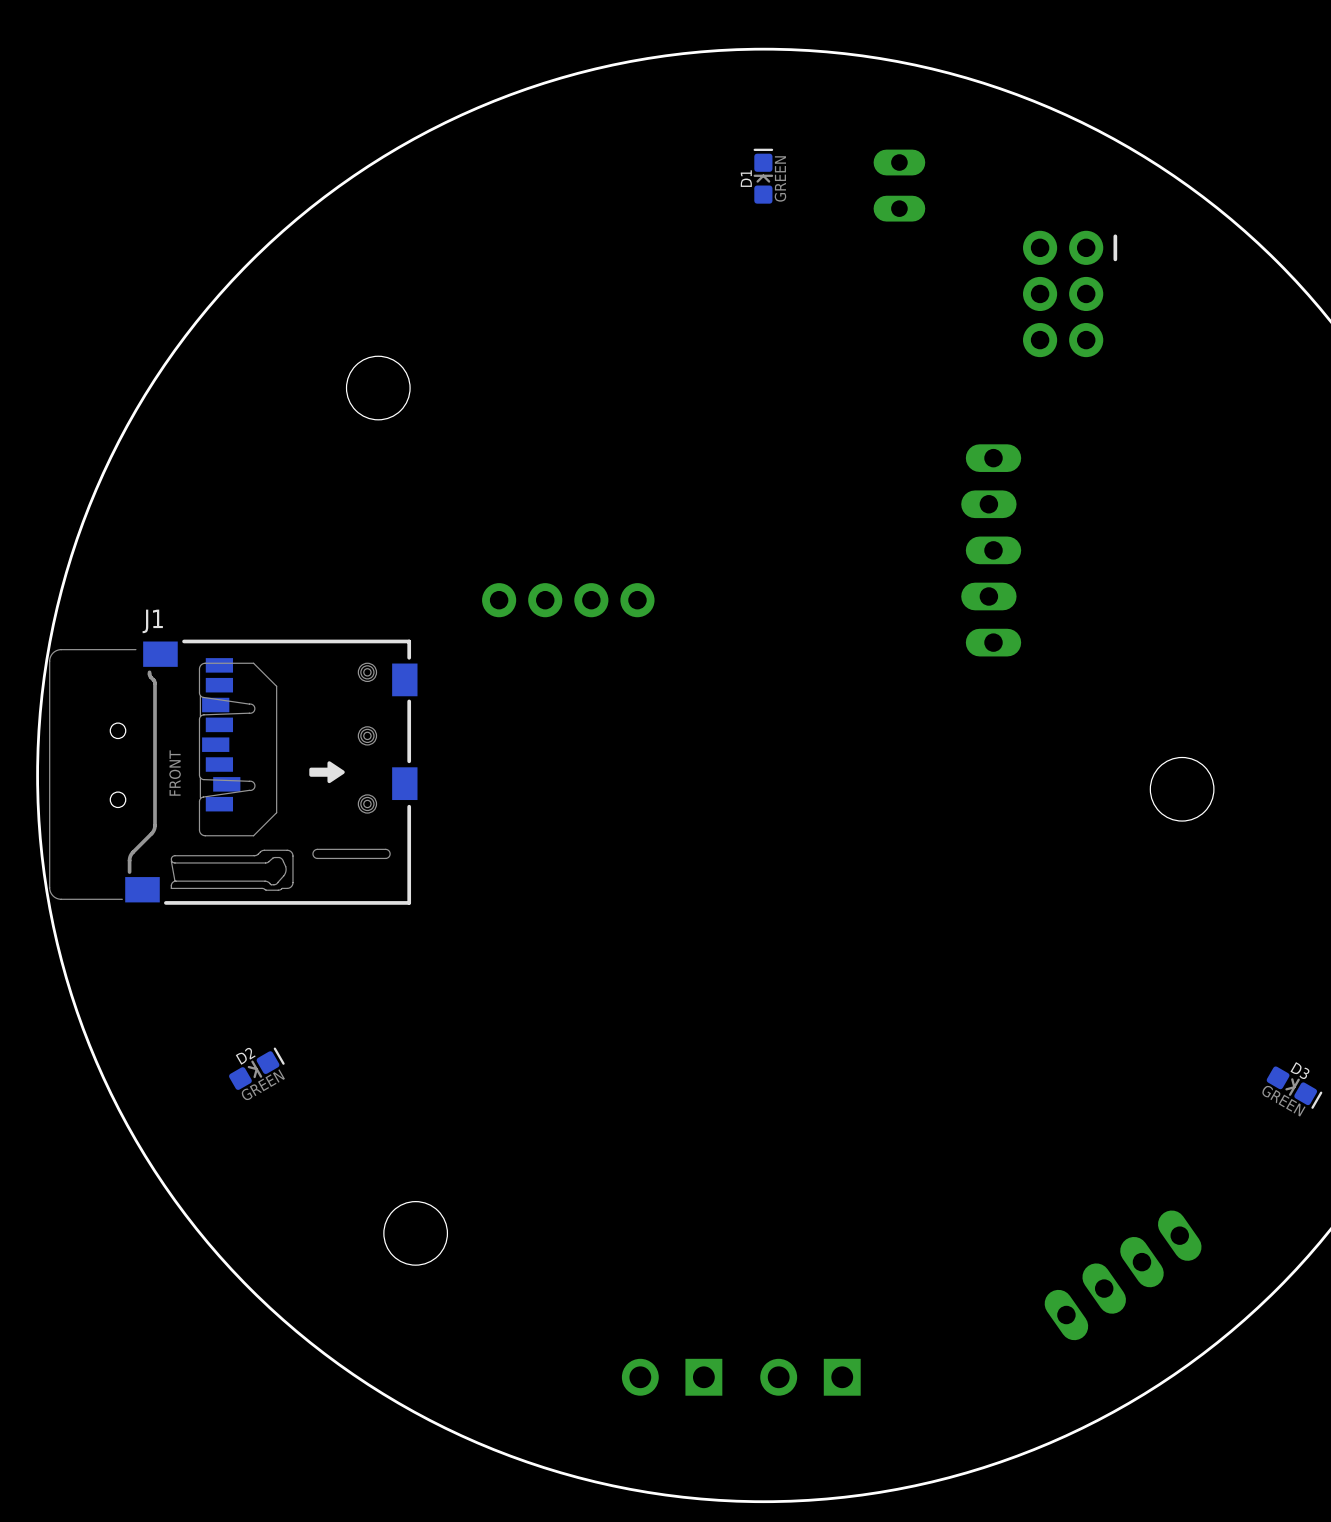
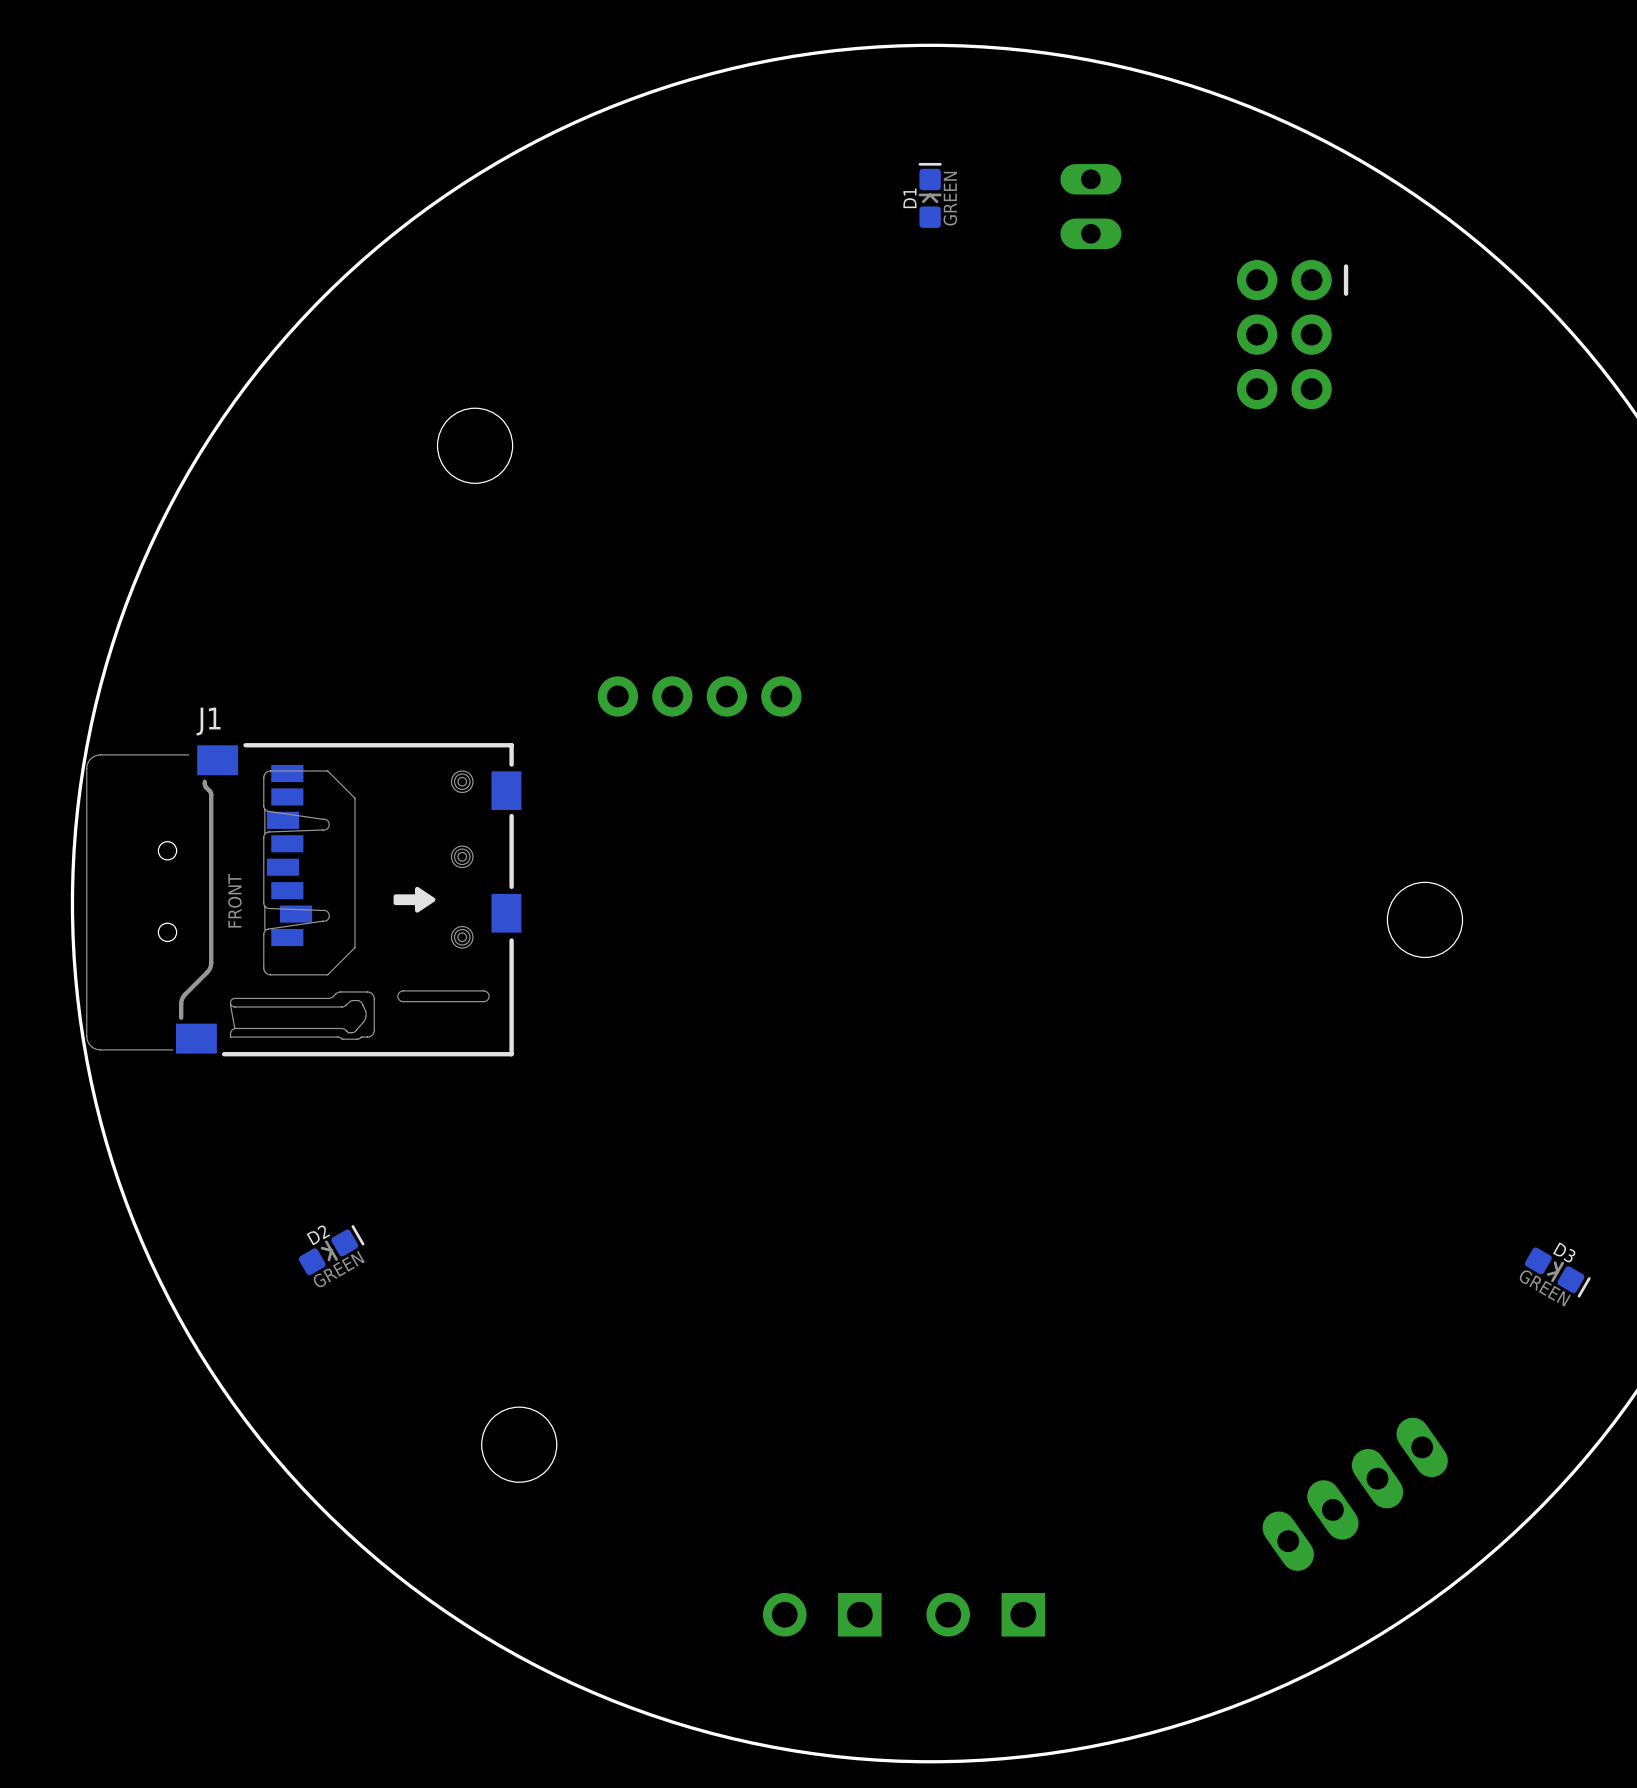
part: (991, 550) -> none

